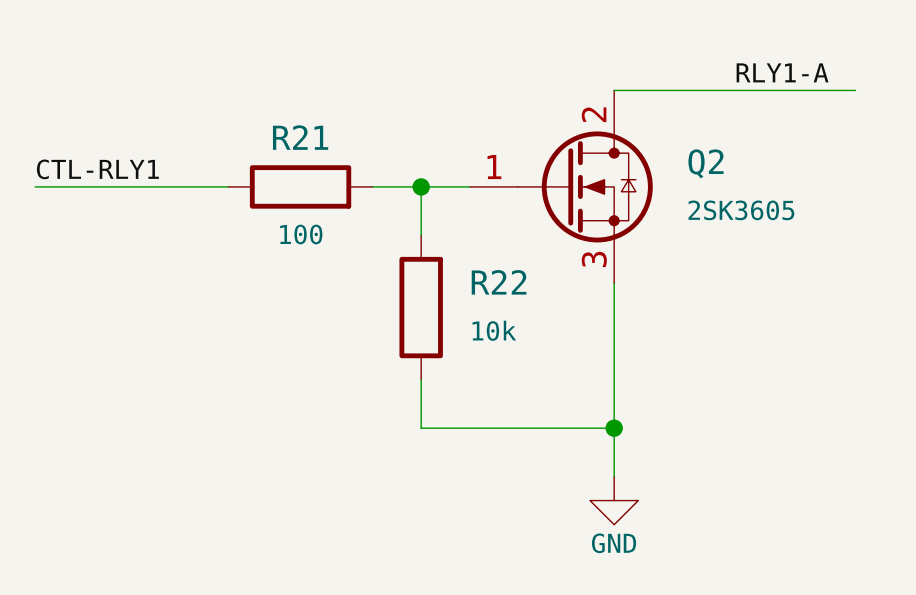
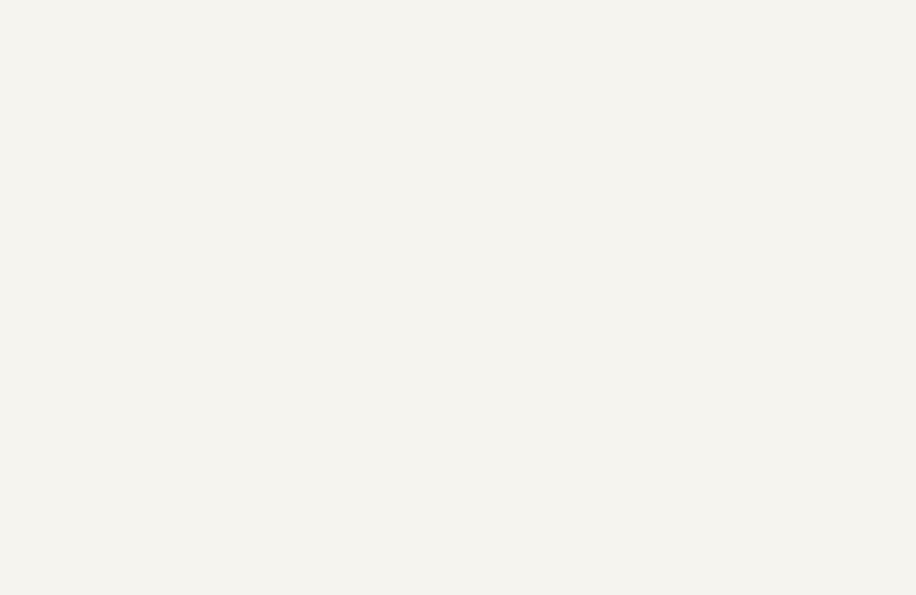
label: RLY1-A (782, 72) -> none
wire: (614, 90) (855, 90) -> none
label: CTL-RLY1 (97, 169) -> none
wire: (35, 186) (228, 186) -> none
R21: 100 (300, 186) -> none
wire: (372, 186) (469, 186) -> none
wire: (421, 186) (421, 235) -> none
junction: (421, 186) -> none
Q2: 2SK3605 (561, 186) -> none
wire: (614, 283) (614, 476) -> none
R22: 10k (421, 307) -> none
wire: (421, 379) (421, 428) (614, 428) -> none
junction: (614, 428) -> none
power symbol: GND (614, 500) -> none

